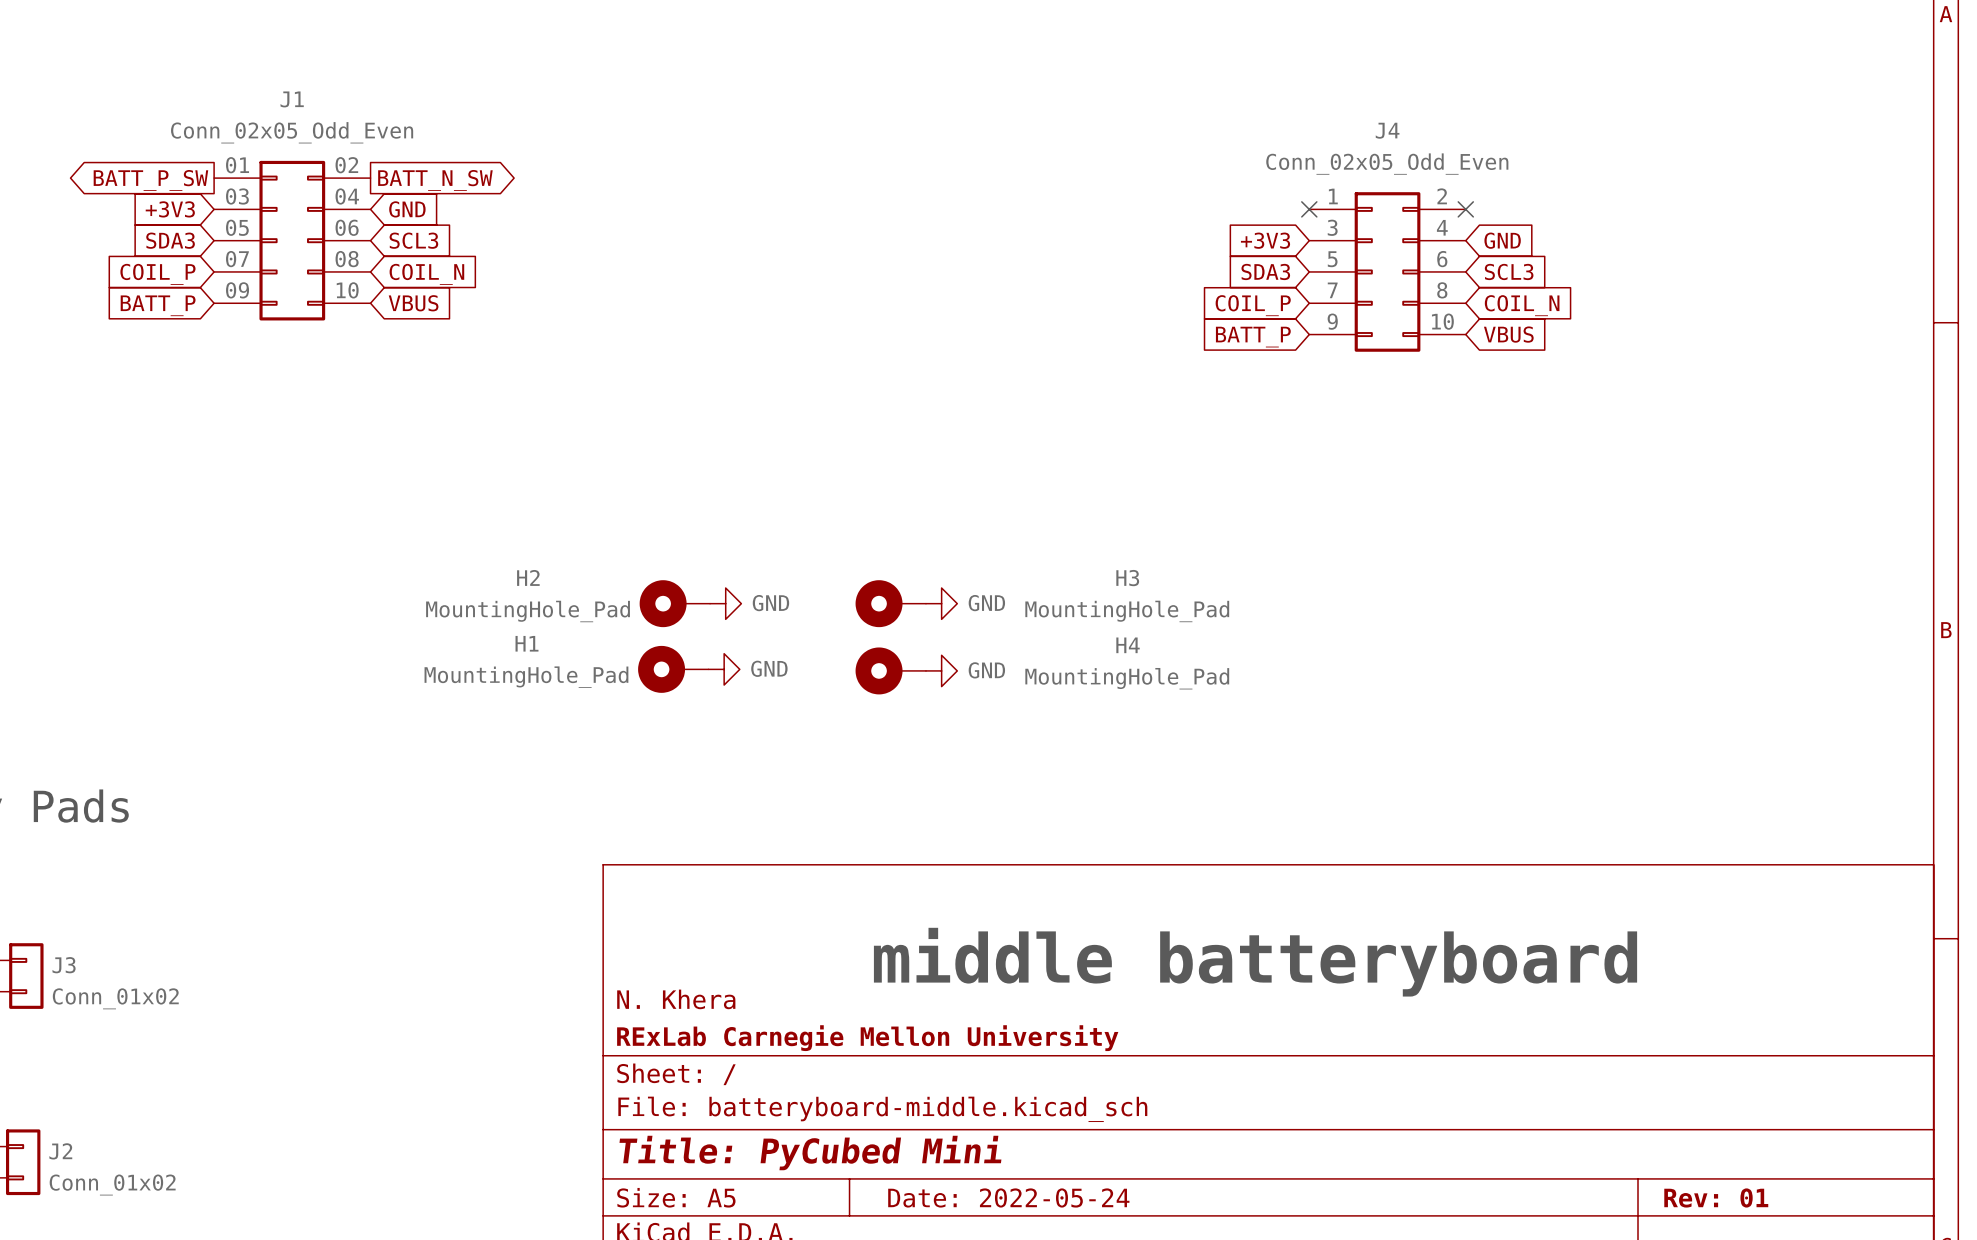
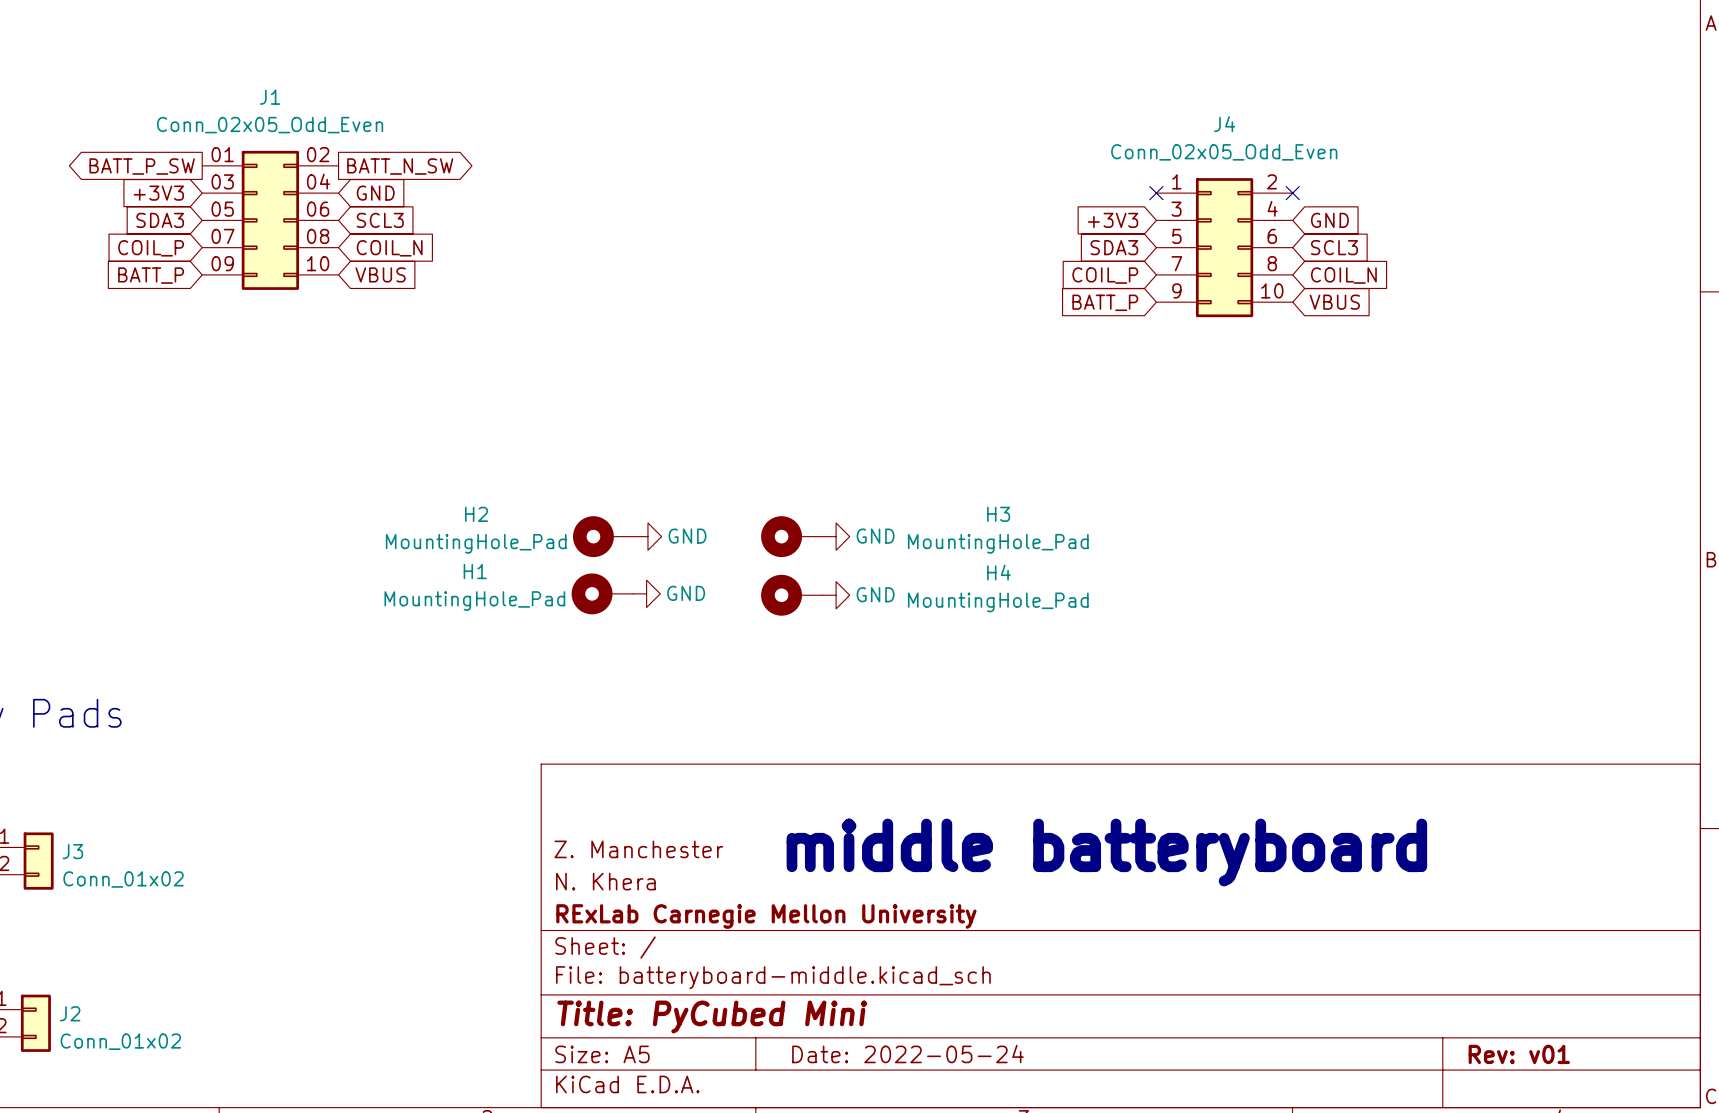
title block: none -> Z. Manchester (638, 849)
title block: Rev: 01 (1716, 1197) -> Rev: v01 (1519, 1054)

